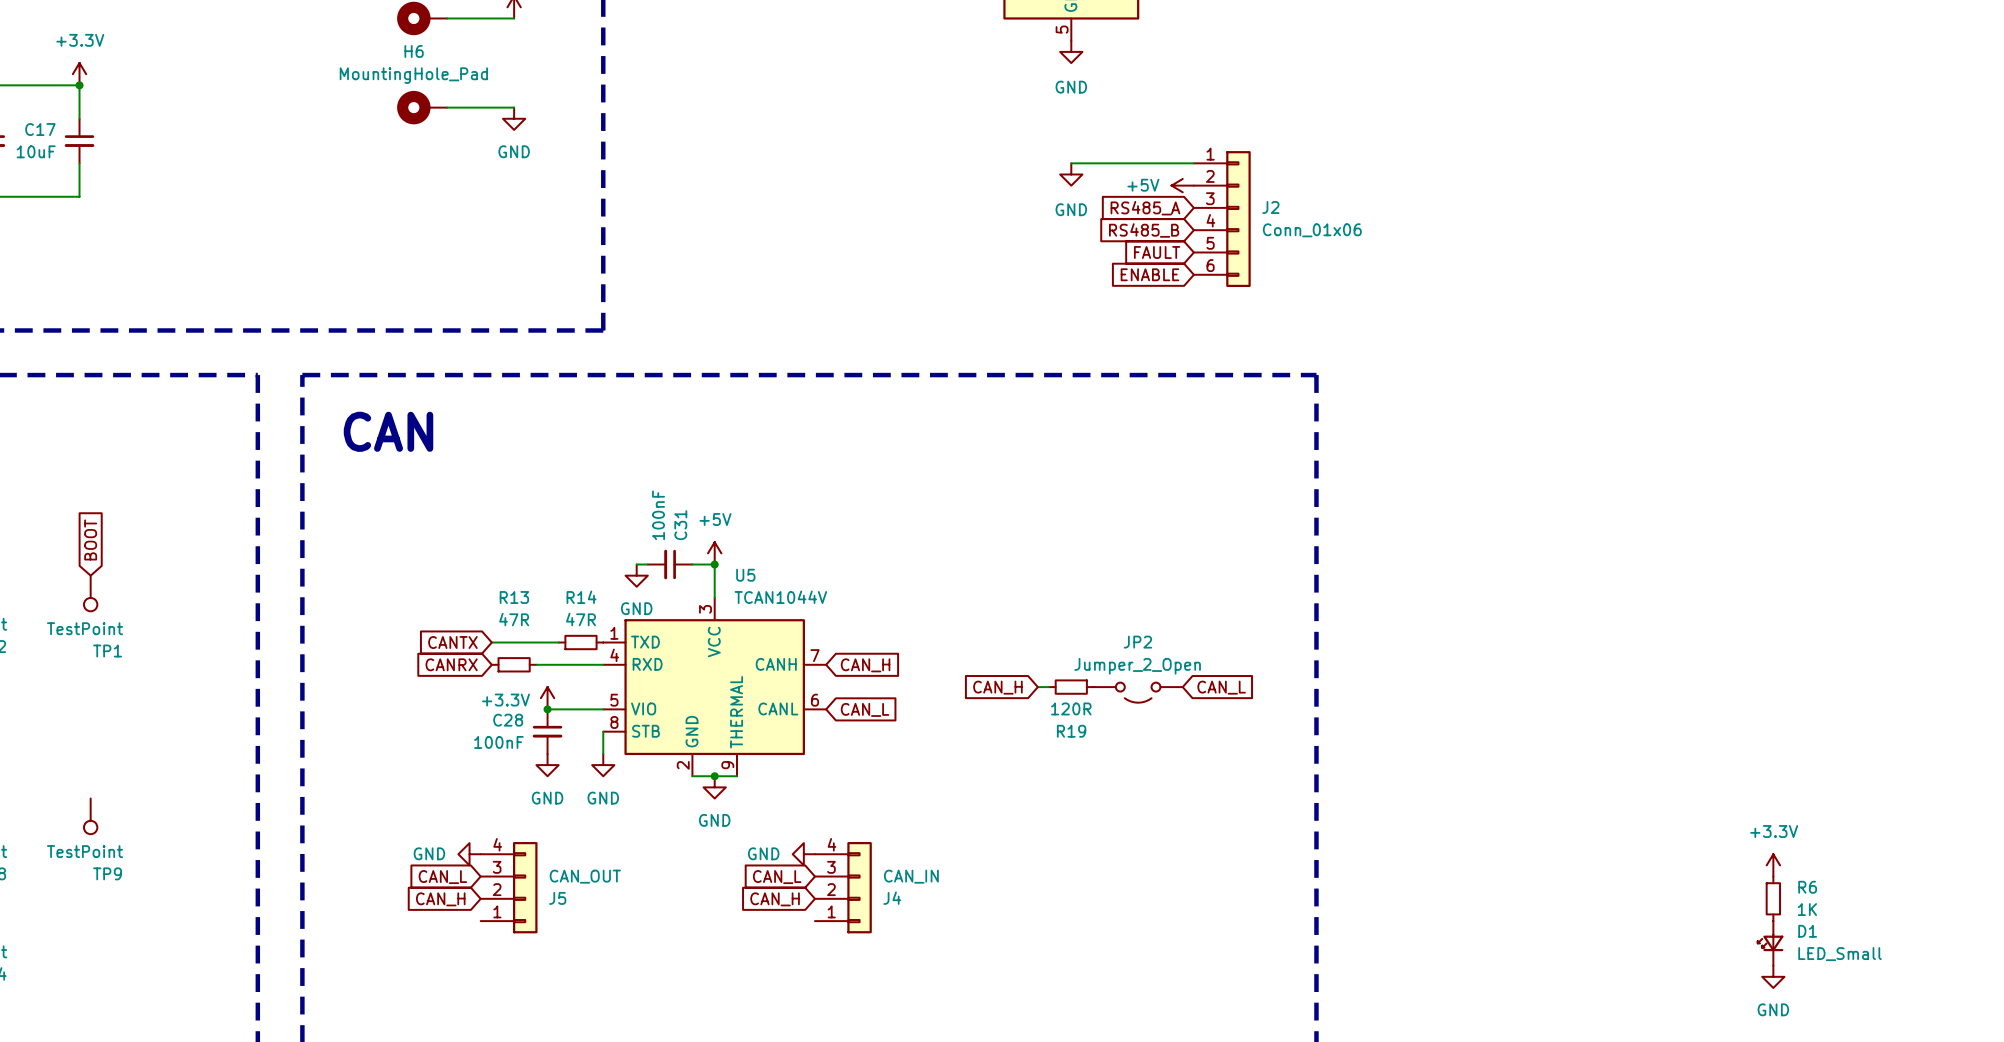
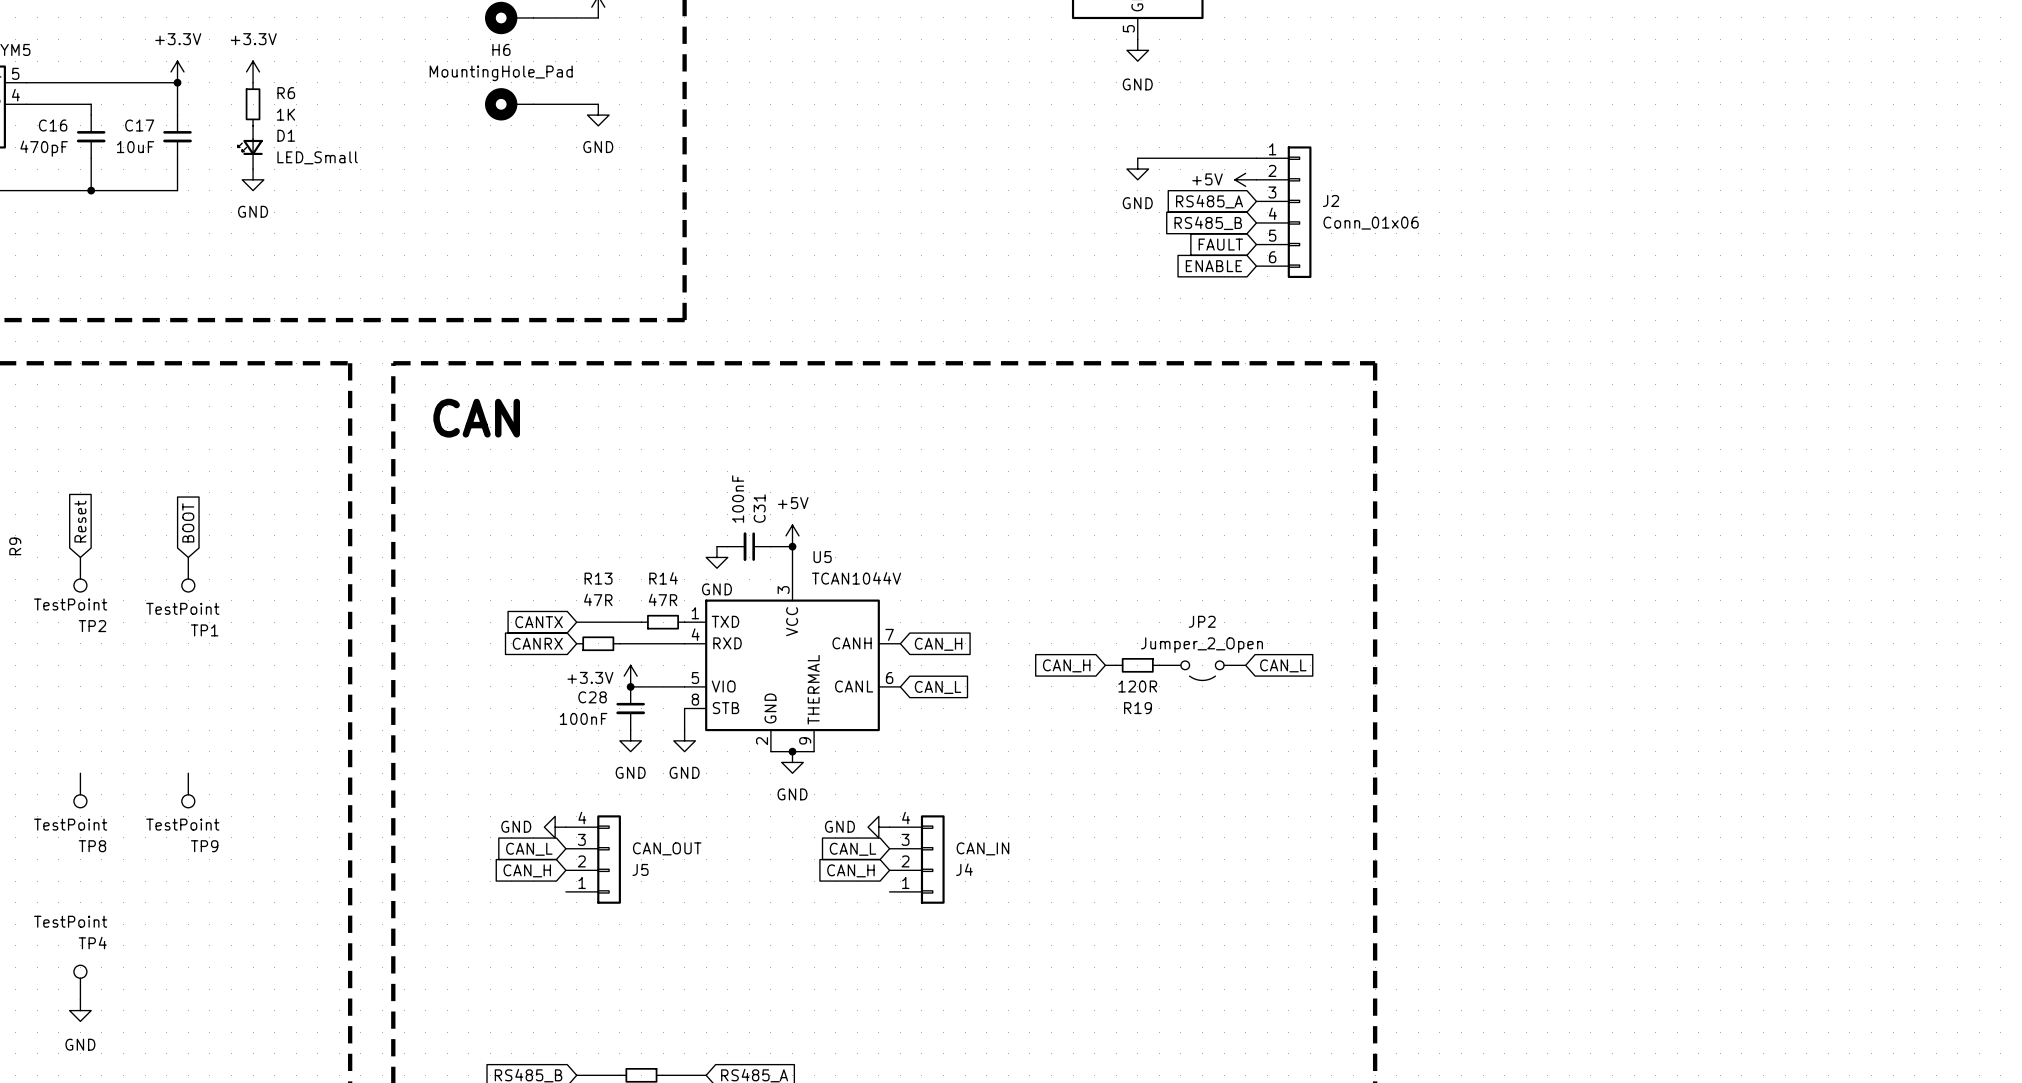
power symbol: none -> +3.3V (253, 71)
power symbol: none -> GND (253, 179)
power symbol: +3.3V (1773, 865) -> none
R6 position: (1773, 898) -> (253, 104)
D1 position: (1770, 943) -> (250, 147)
power symbol: GND (1773, 976) -> none

